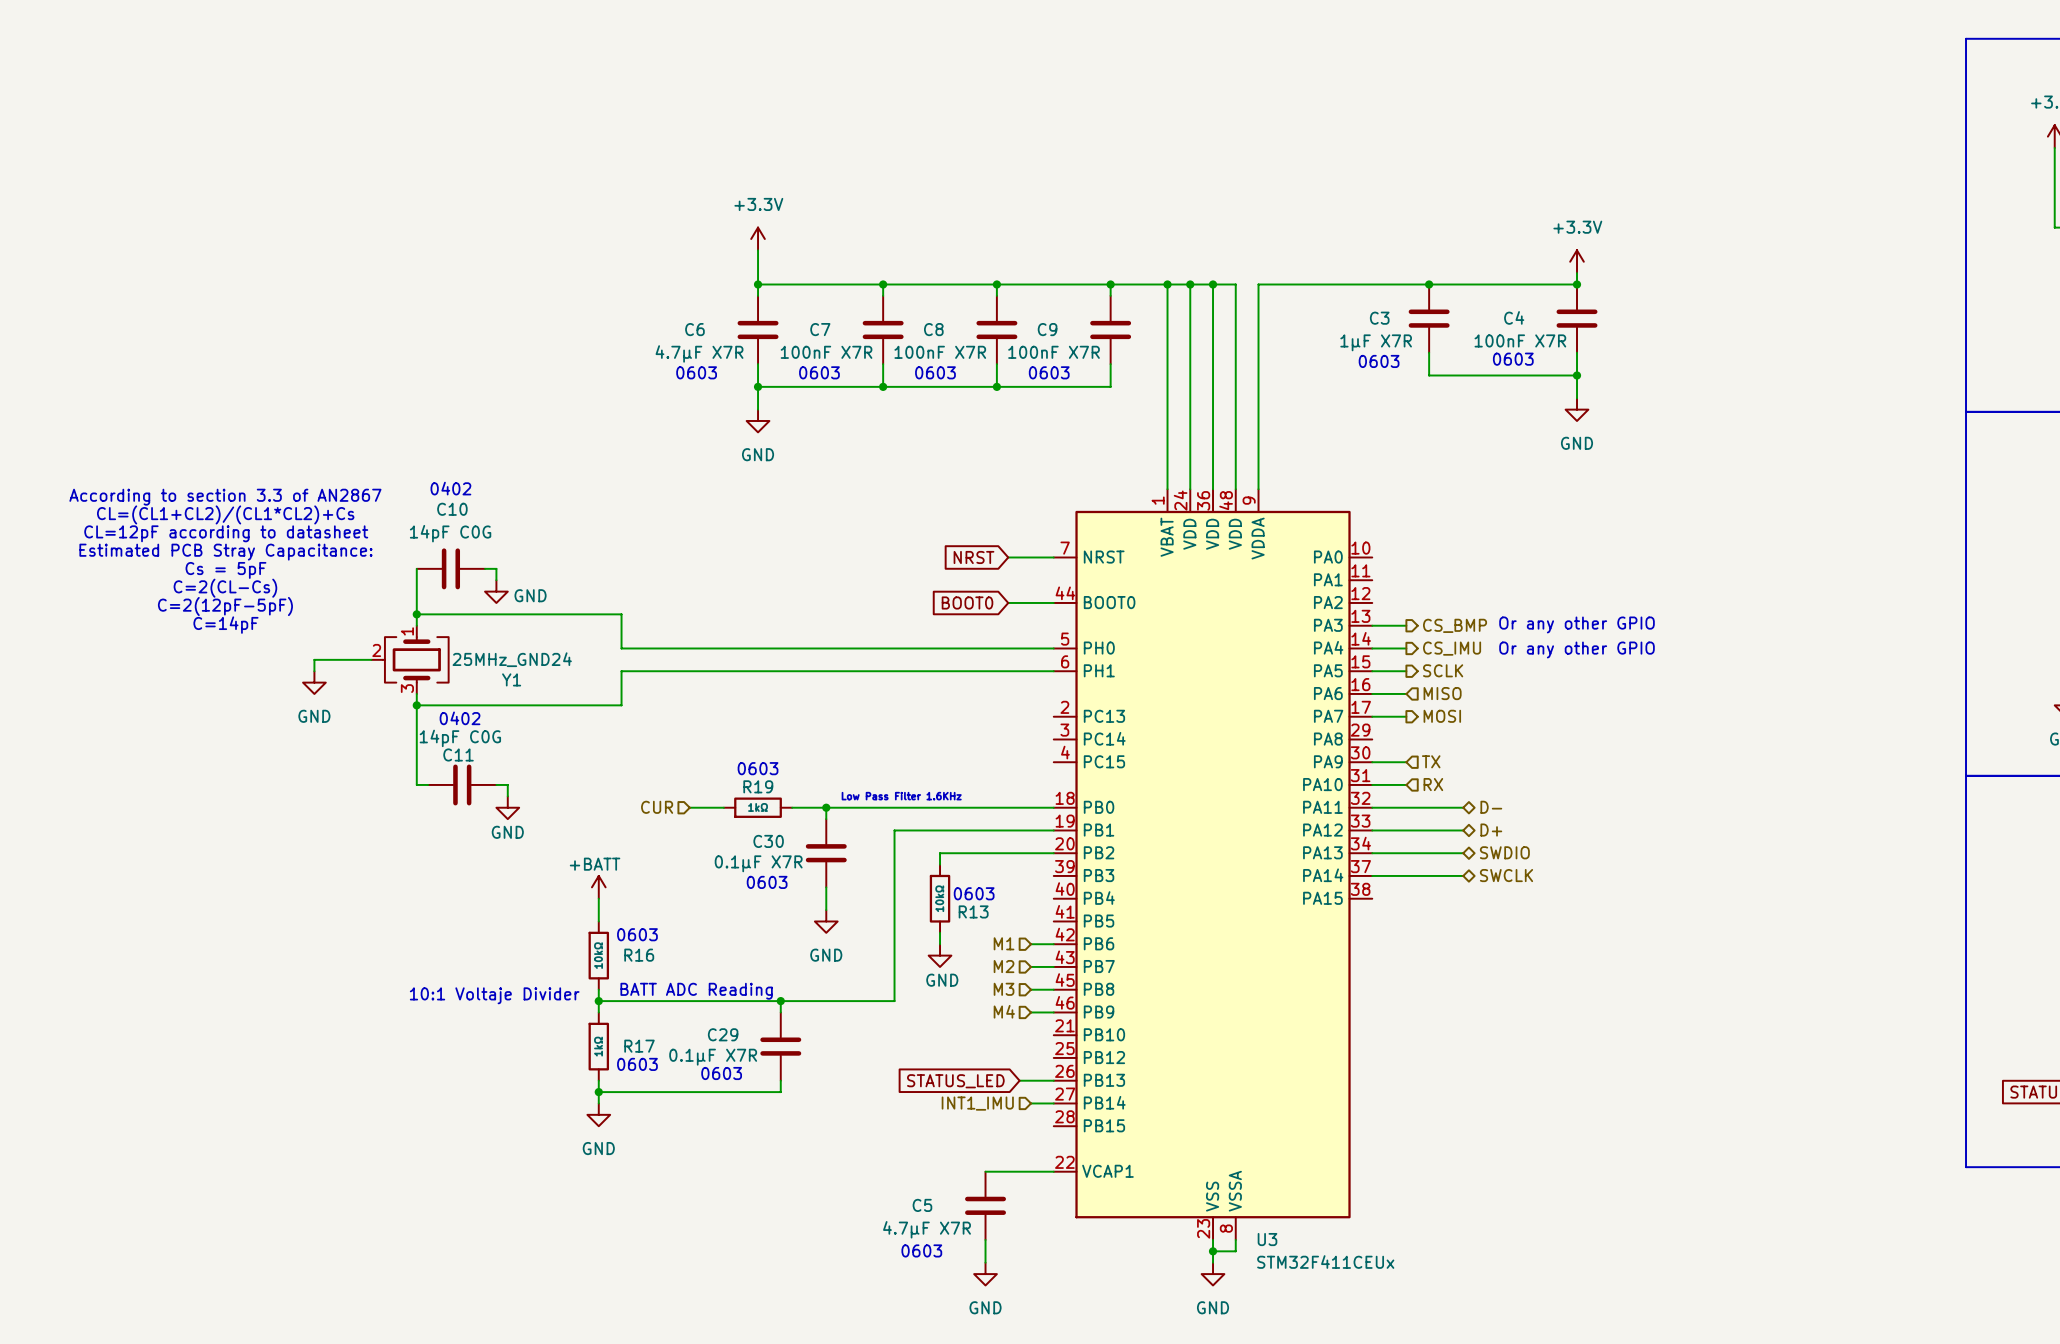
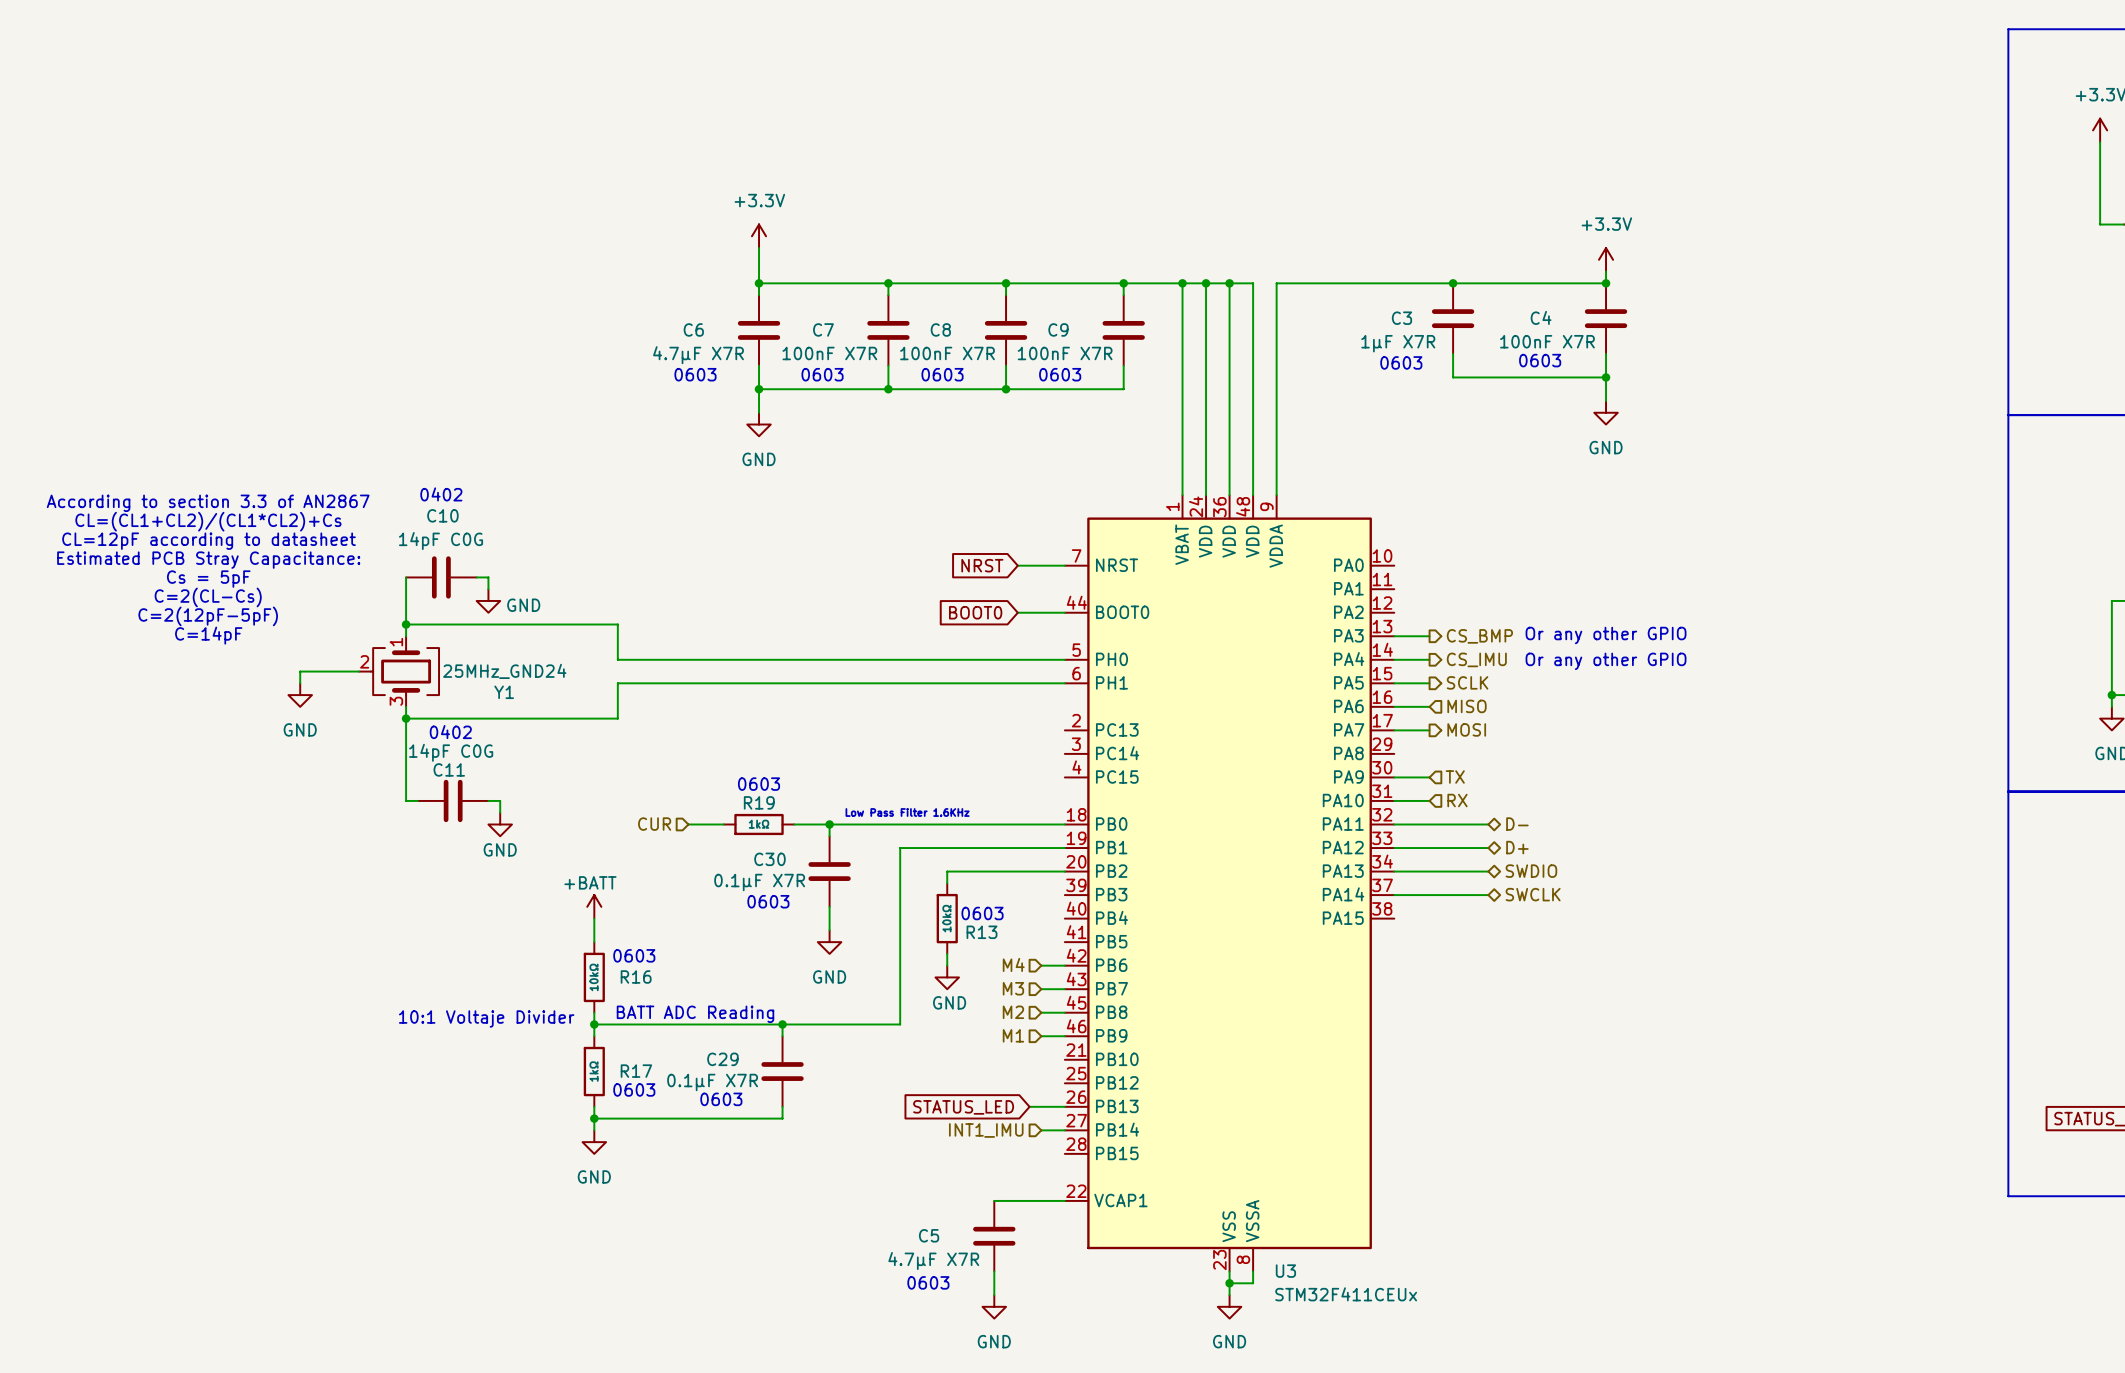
hierarchical label: M1 (1004, 943) -> M4 (1013, 964)
hierarchical label: M2 (1004, 966) -> M3 (1013, 988)
hierarchical label: M3 (1004, 989) -> M2 (1013, 1012)
hierarchical label: M4 (1004, 1011) -> M1 (1013, 1035)

